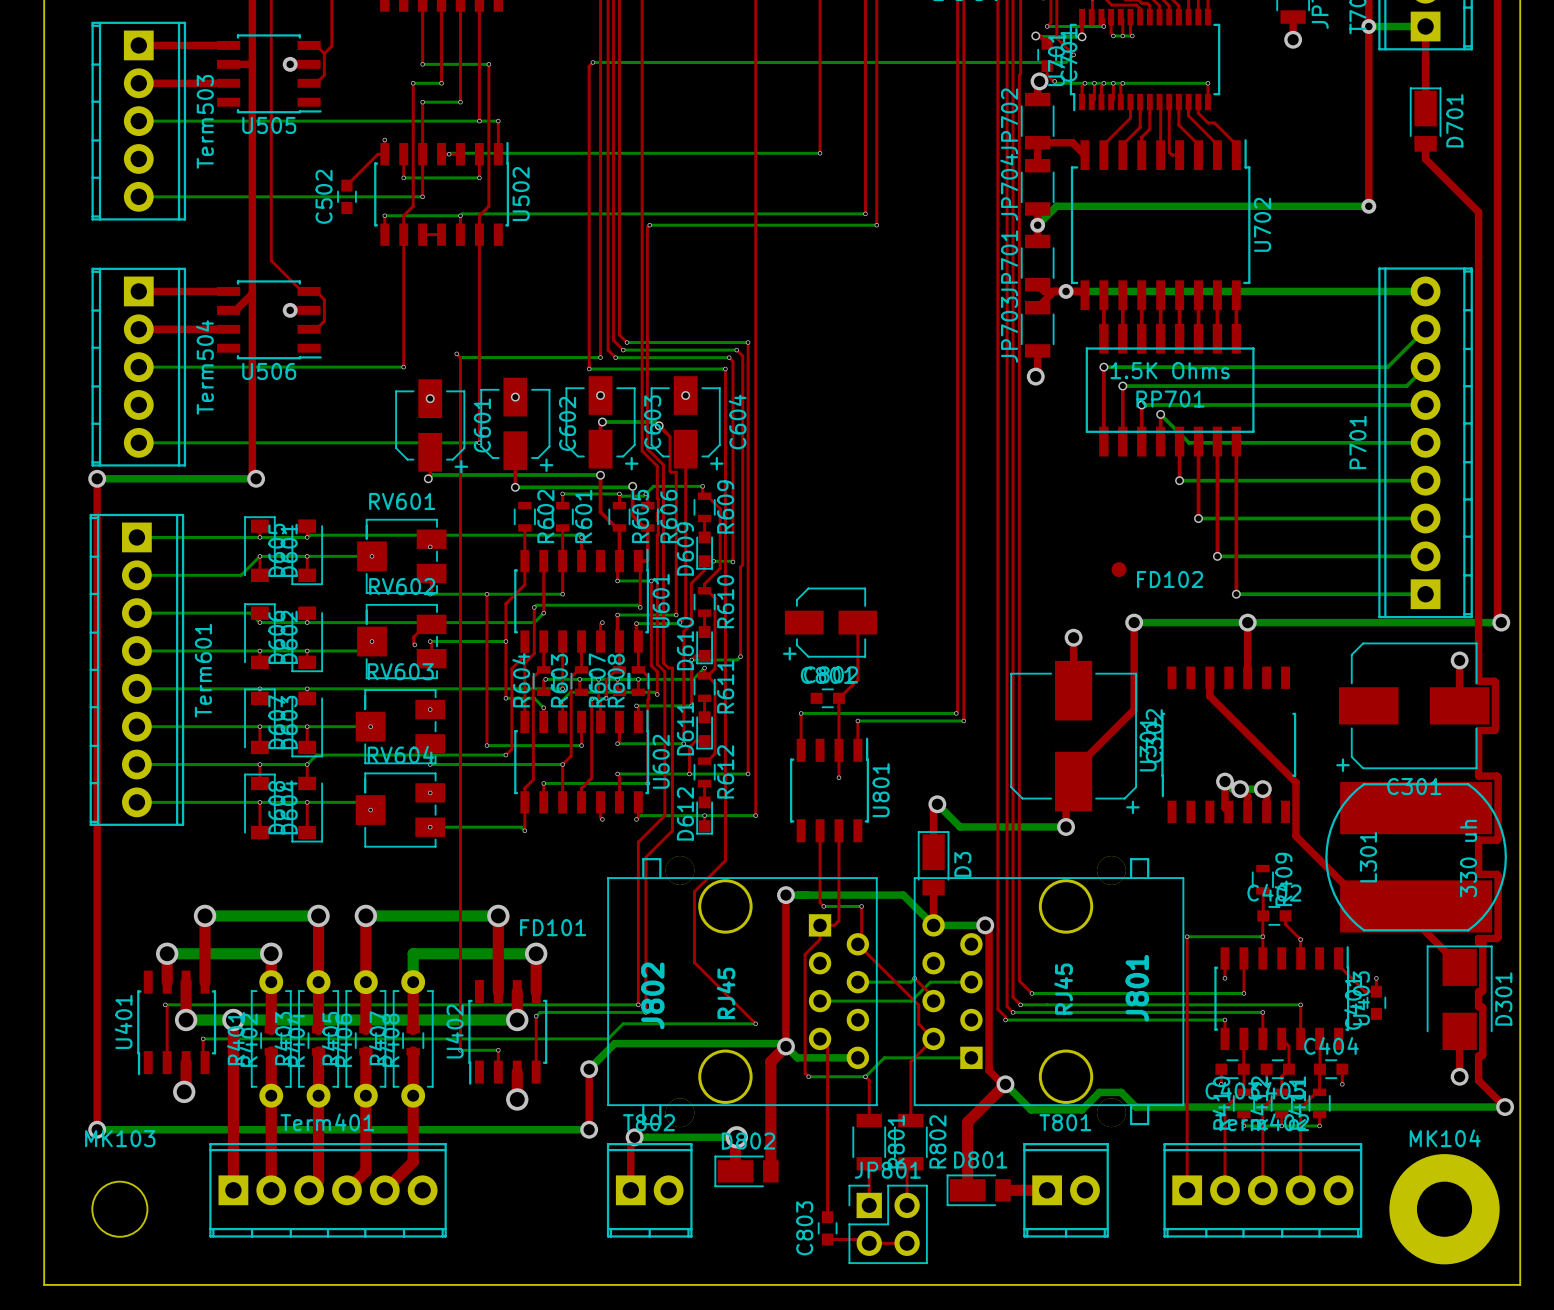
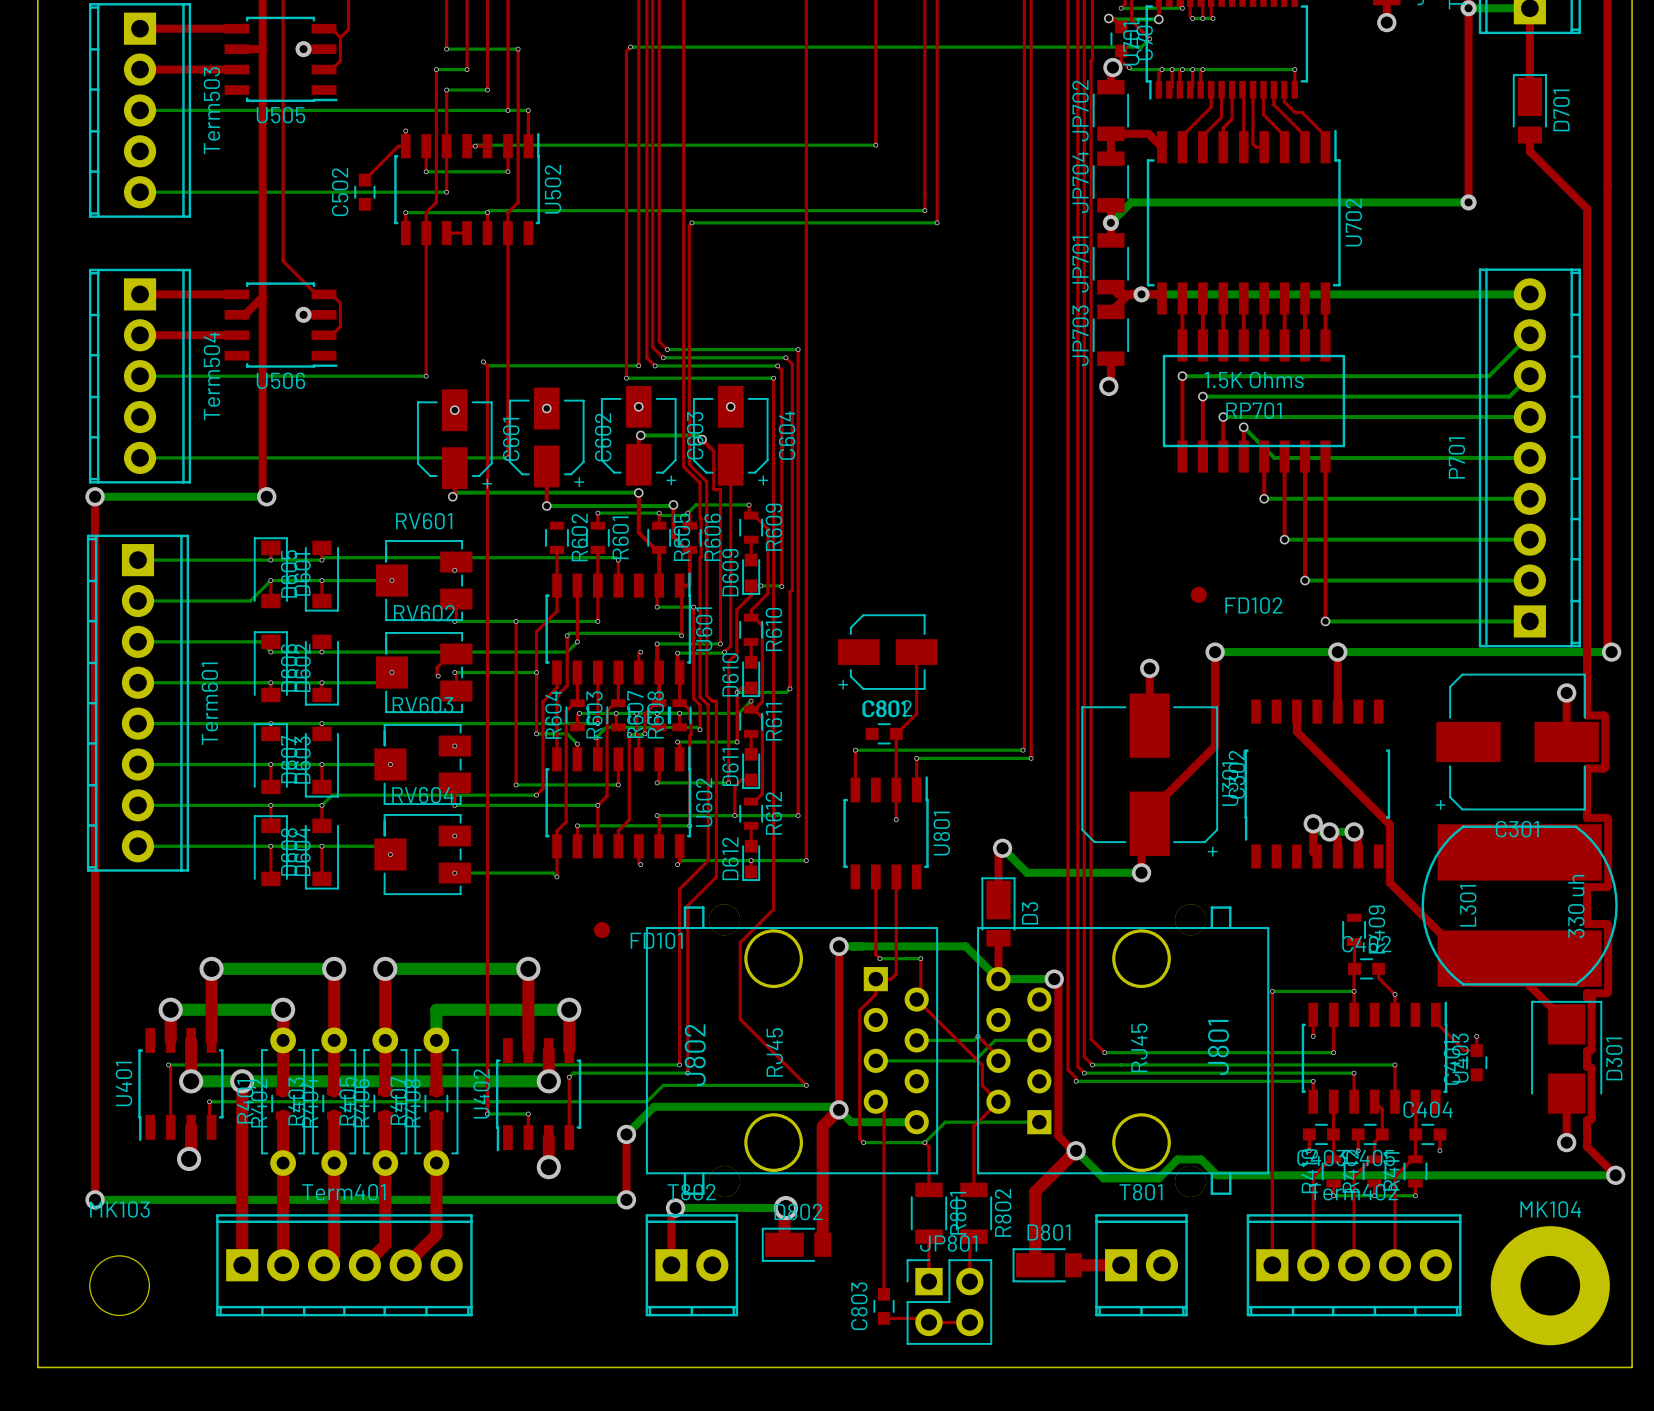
FD101 position: (502, 917) -> (601, 930)

